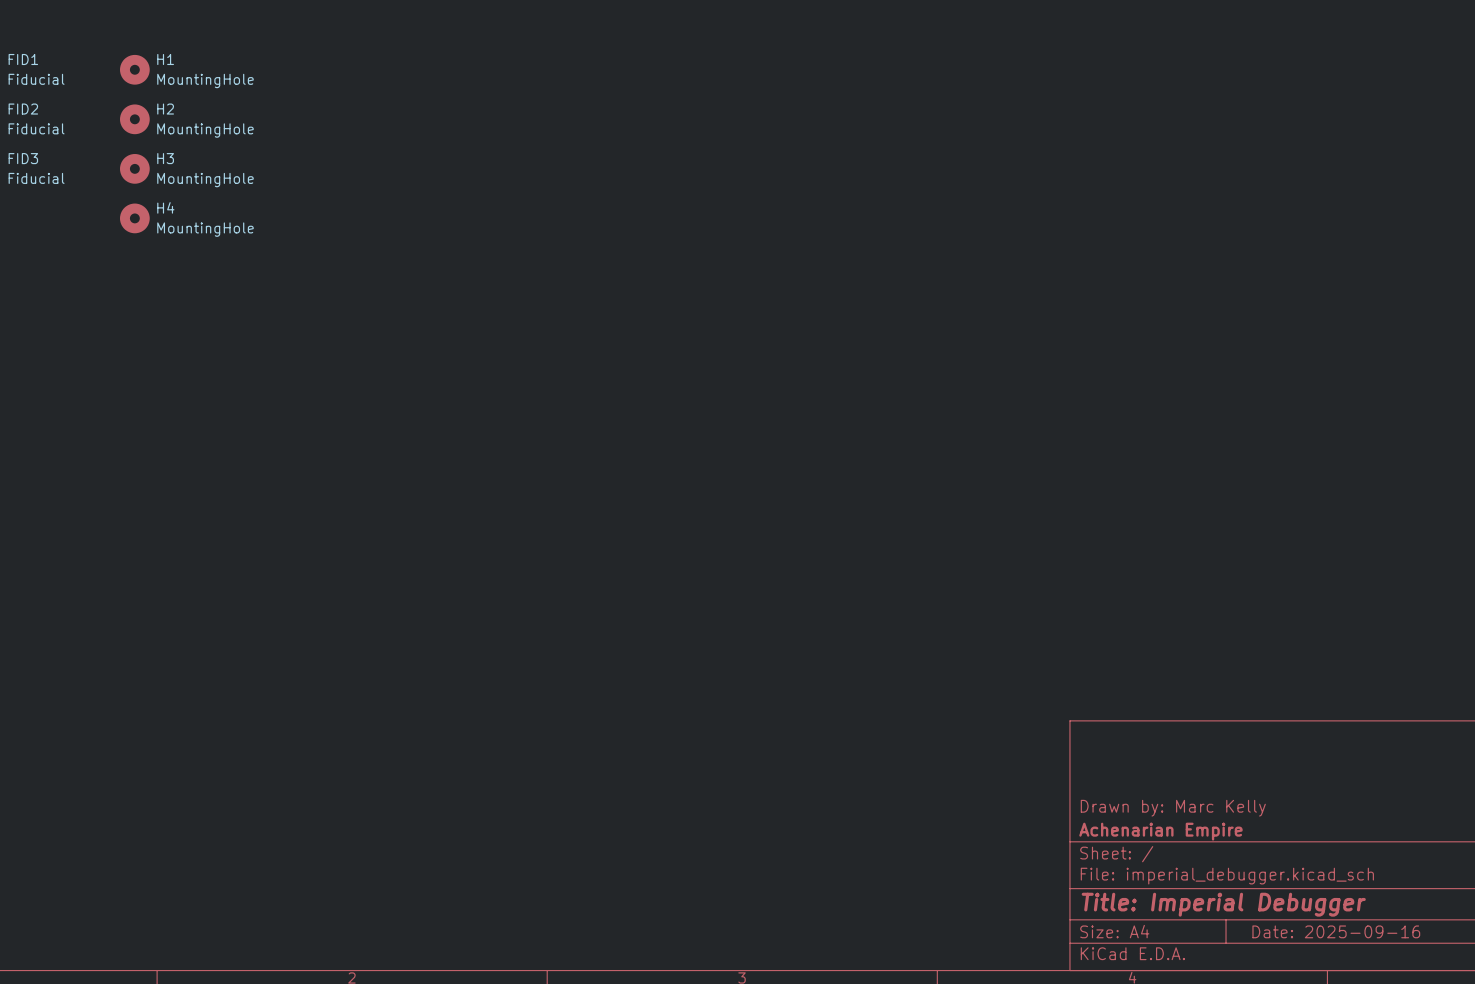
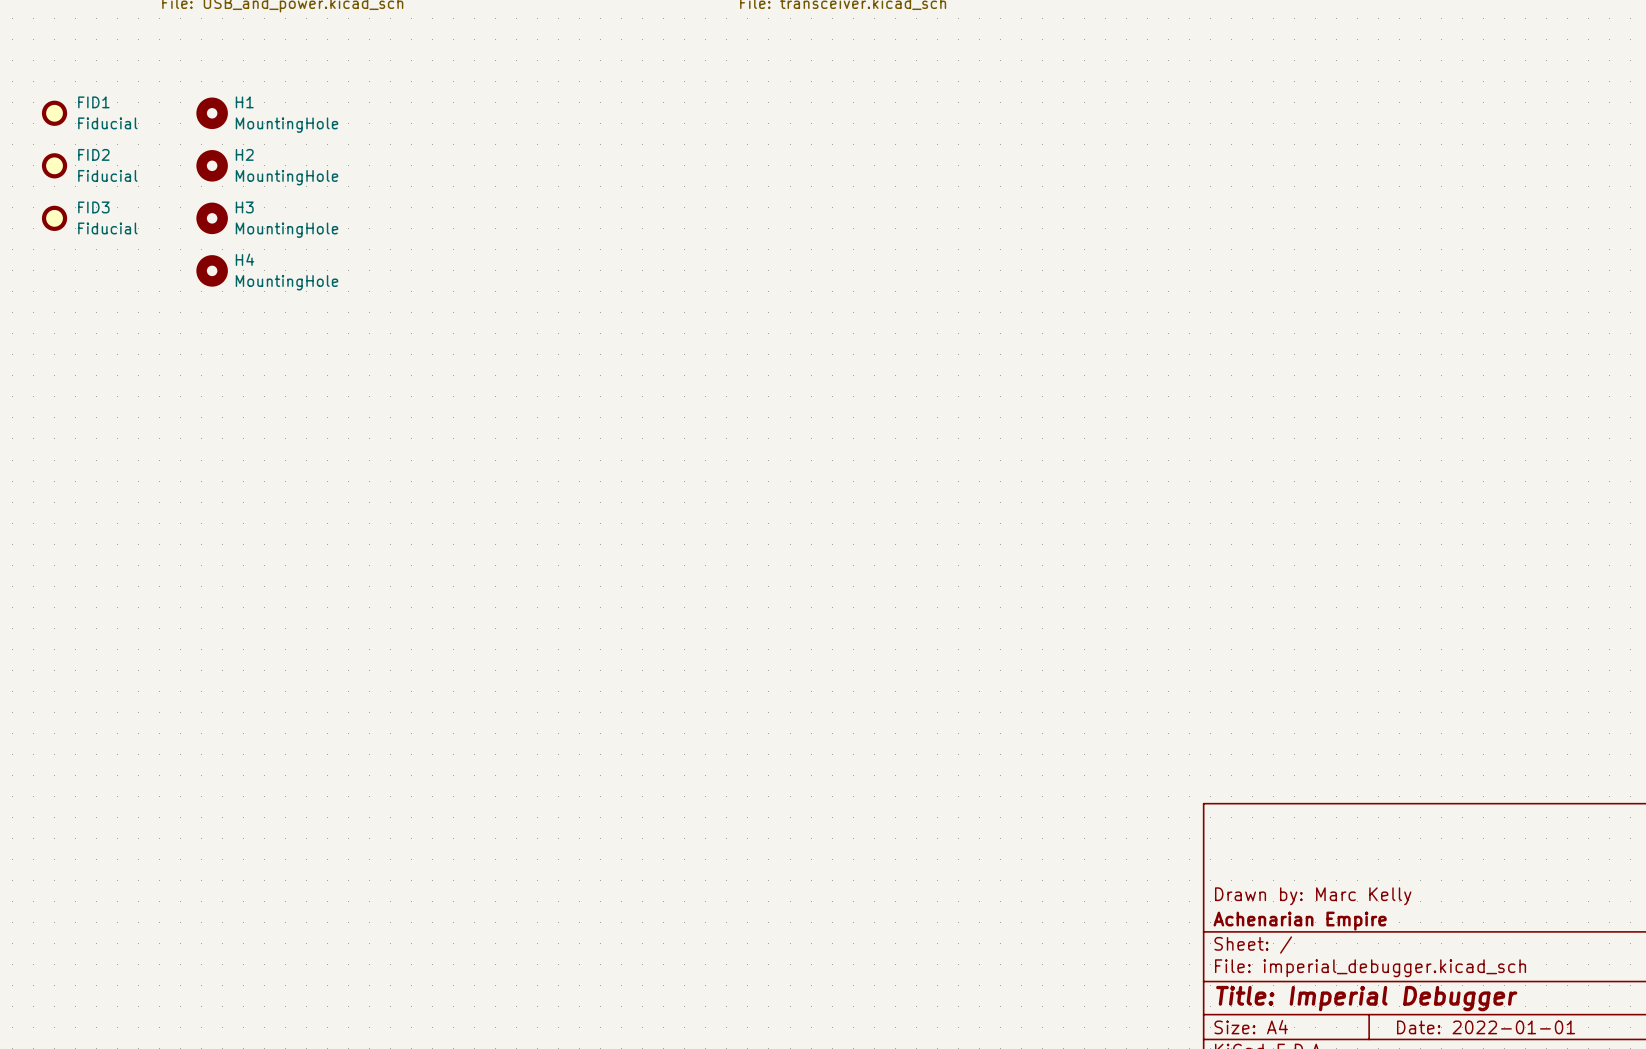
title block: Date: 2025-09-16 (1336, 931) -> Date: 2022-01-01 (1486, 1027)

